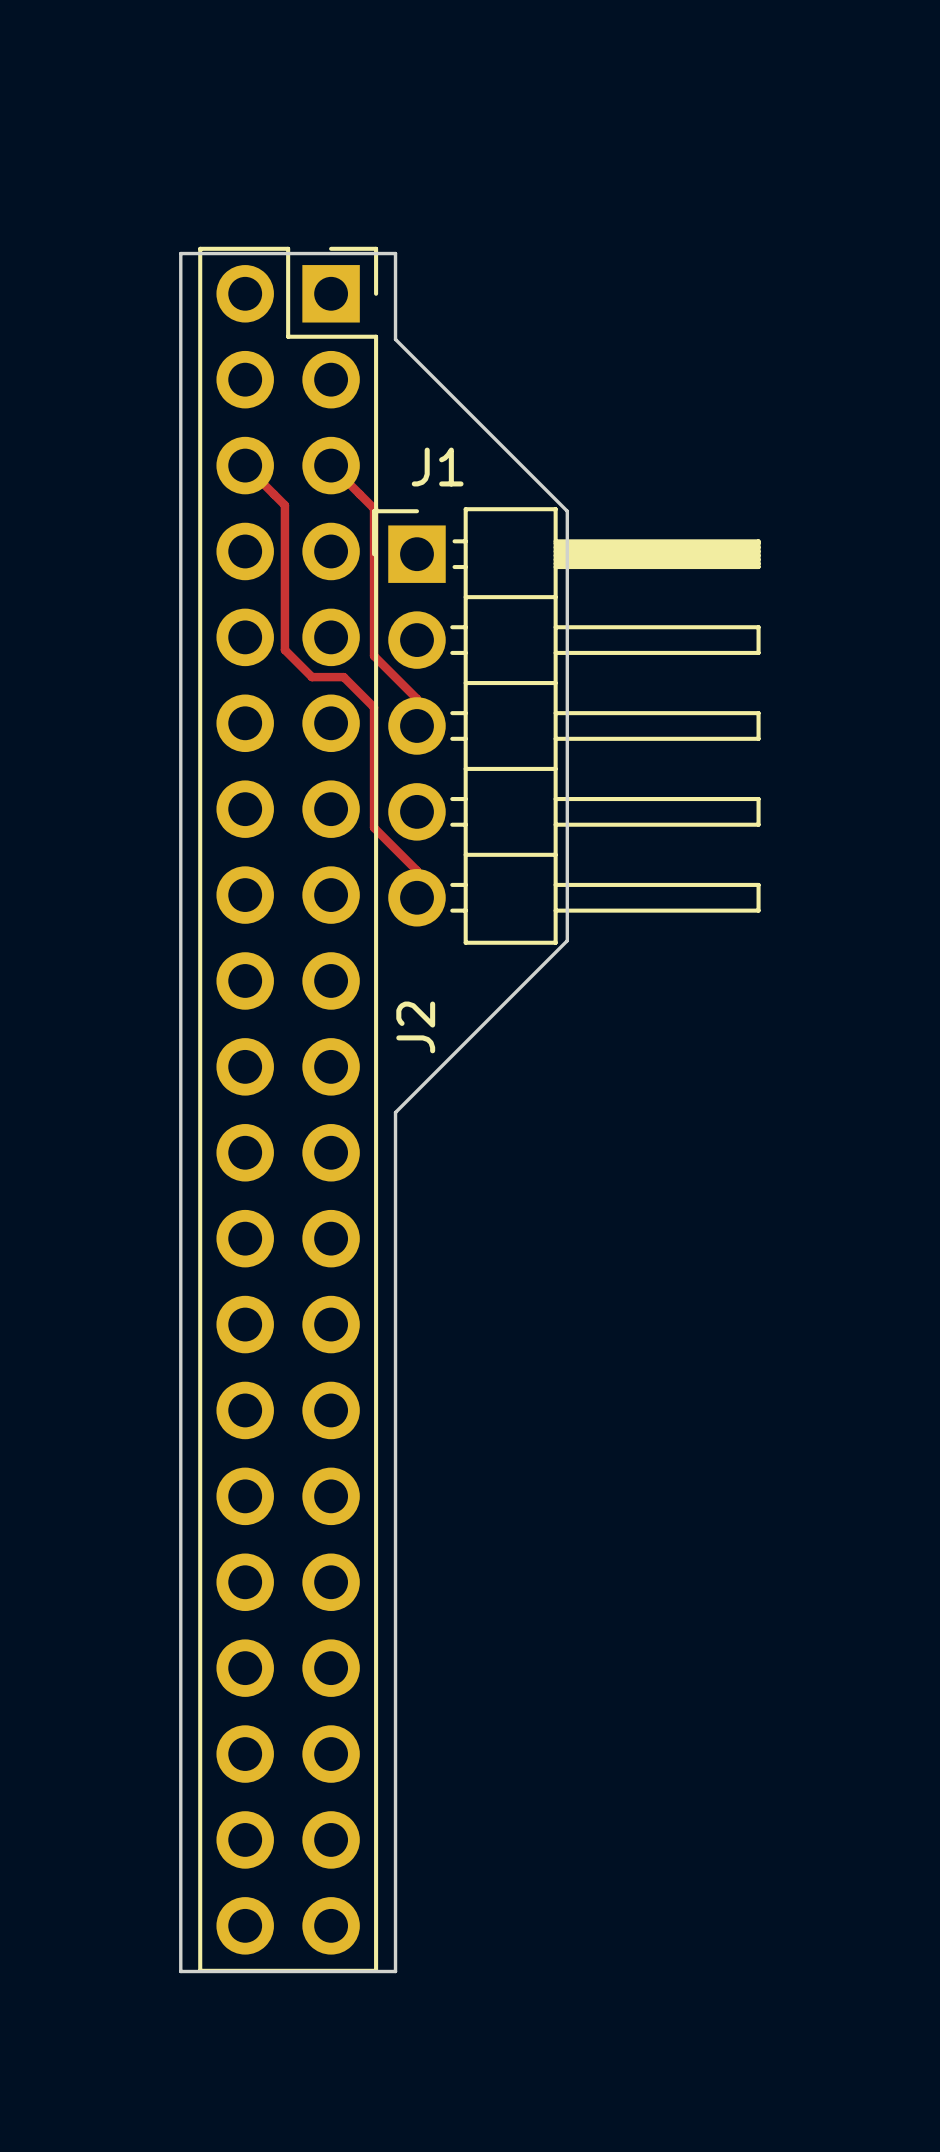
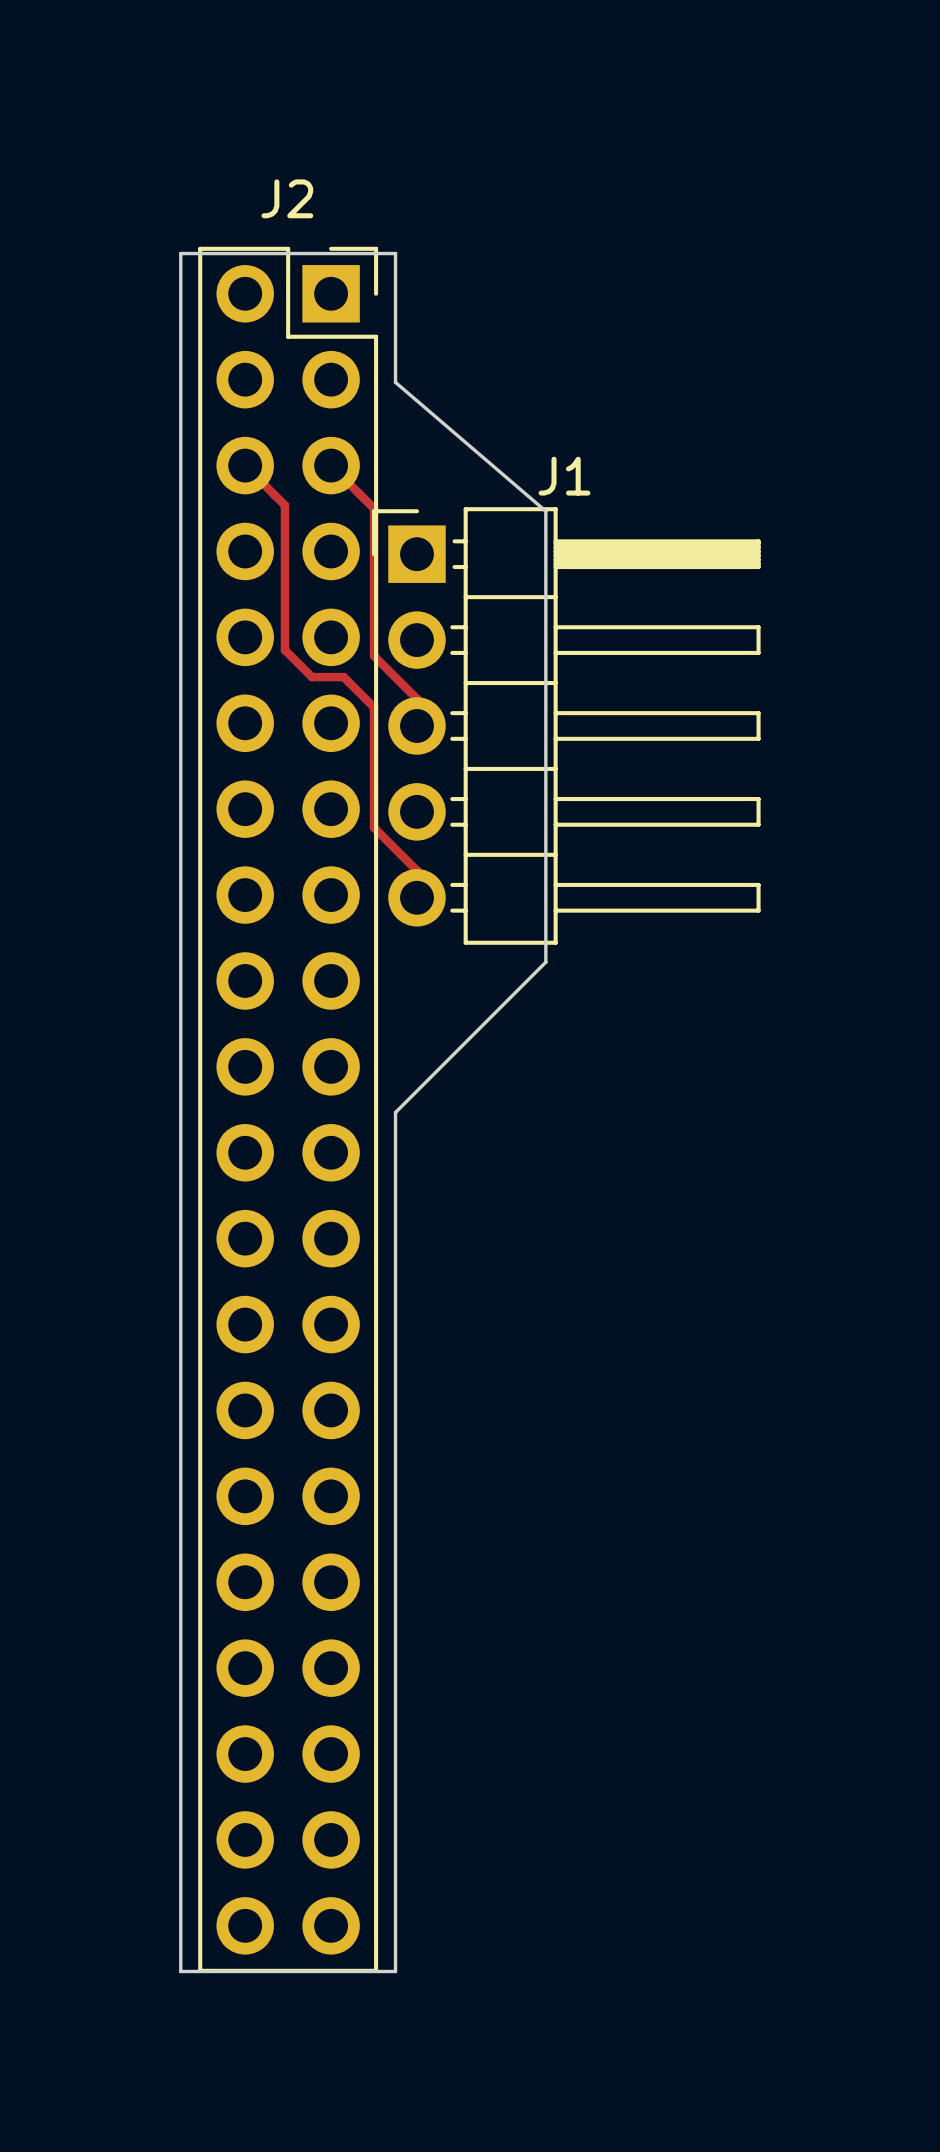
board edge: (395, 339) (567, 511) (567, 940) (545, 962) -> (395, 339) (395, 382) (545, 511) (545, 962)
J1 name position: J1 (437, 467) -> J1 (564, 476)
J2 name rotation: 0° (415, 1027) -> 90° clockwise (287, 198)
J2 name position: J2 (415, 1027) -> J2 (287, 198)

